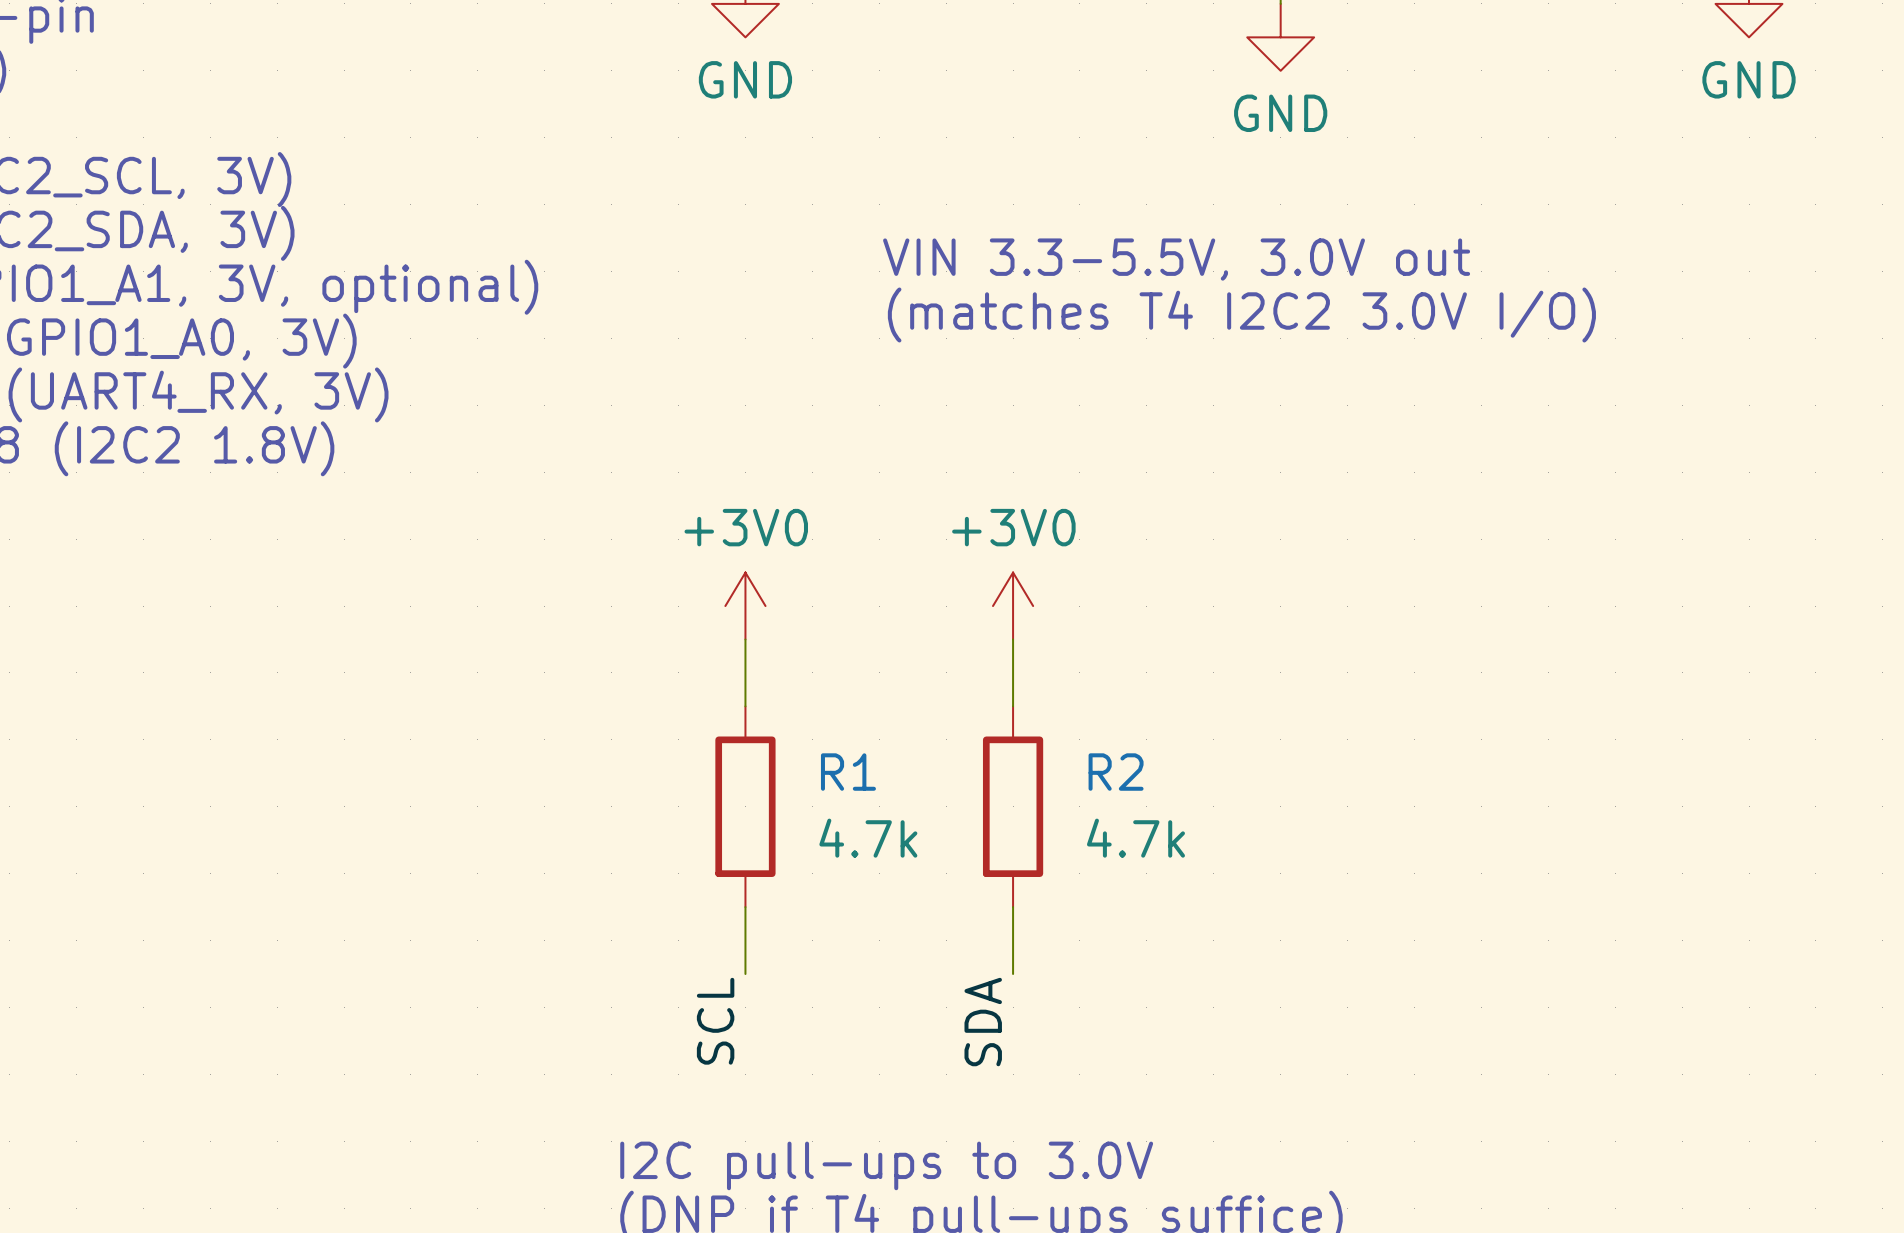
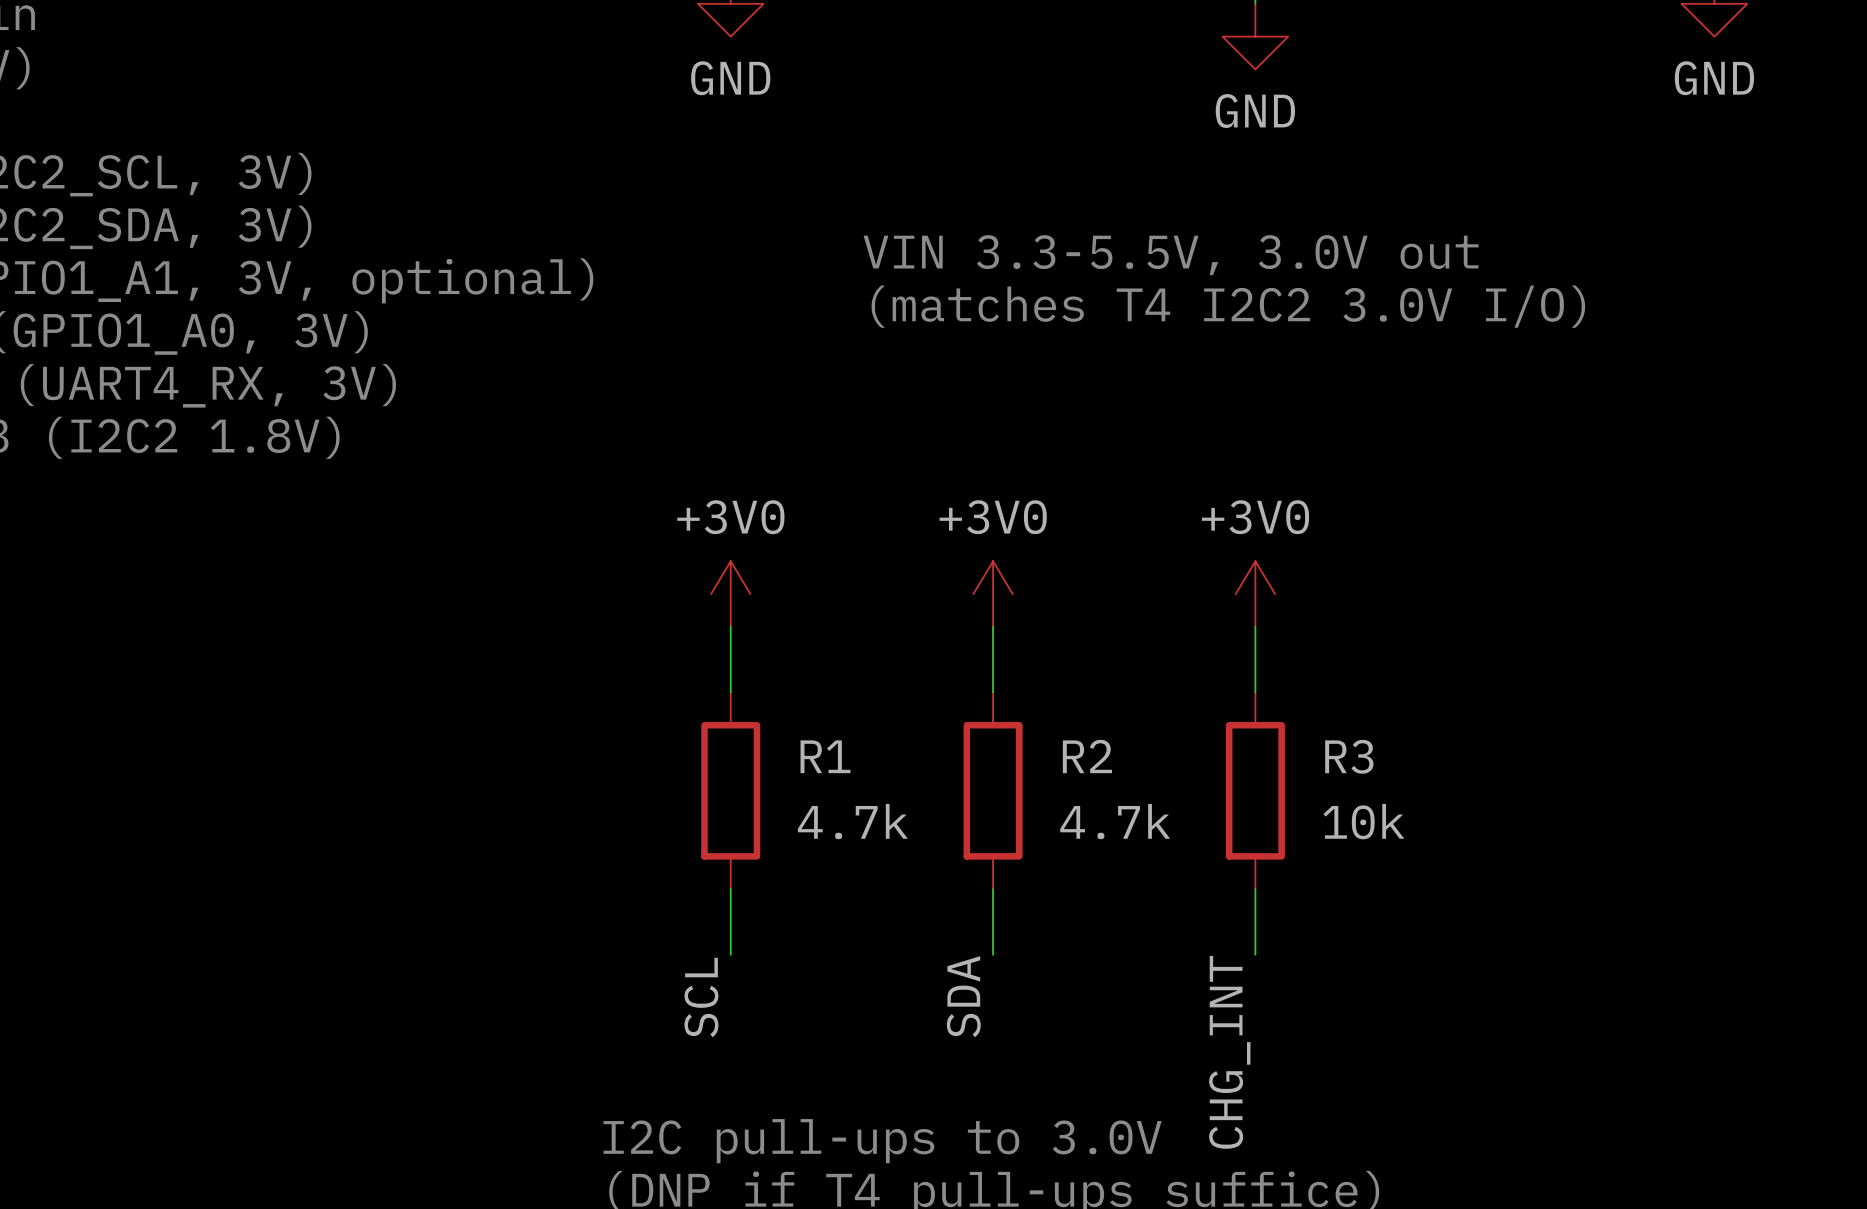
power symbol: none -> +3V0 (1255, 594)
wire: none -> (1255, 626) (1255, 692)
R3: none -> 10k (1255, 790)
wire: none -> (1255, 889) (1255, 954)
label: none -> CHG_INT (1229, 1052)

